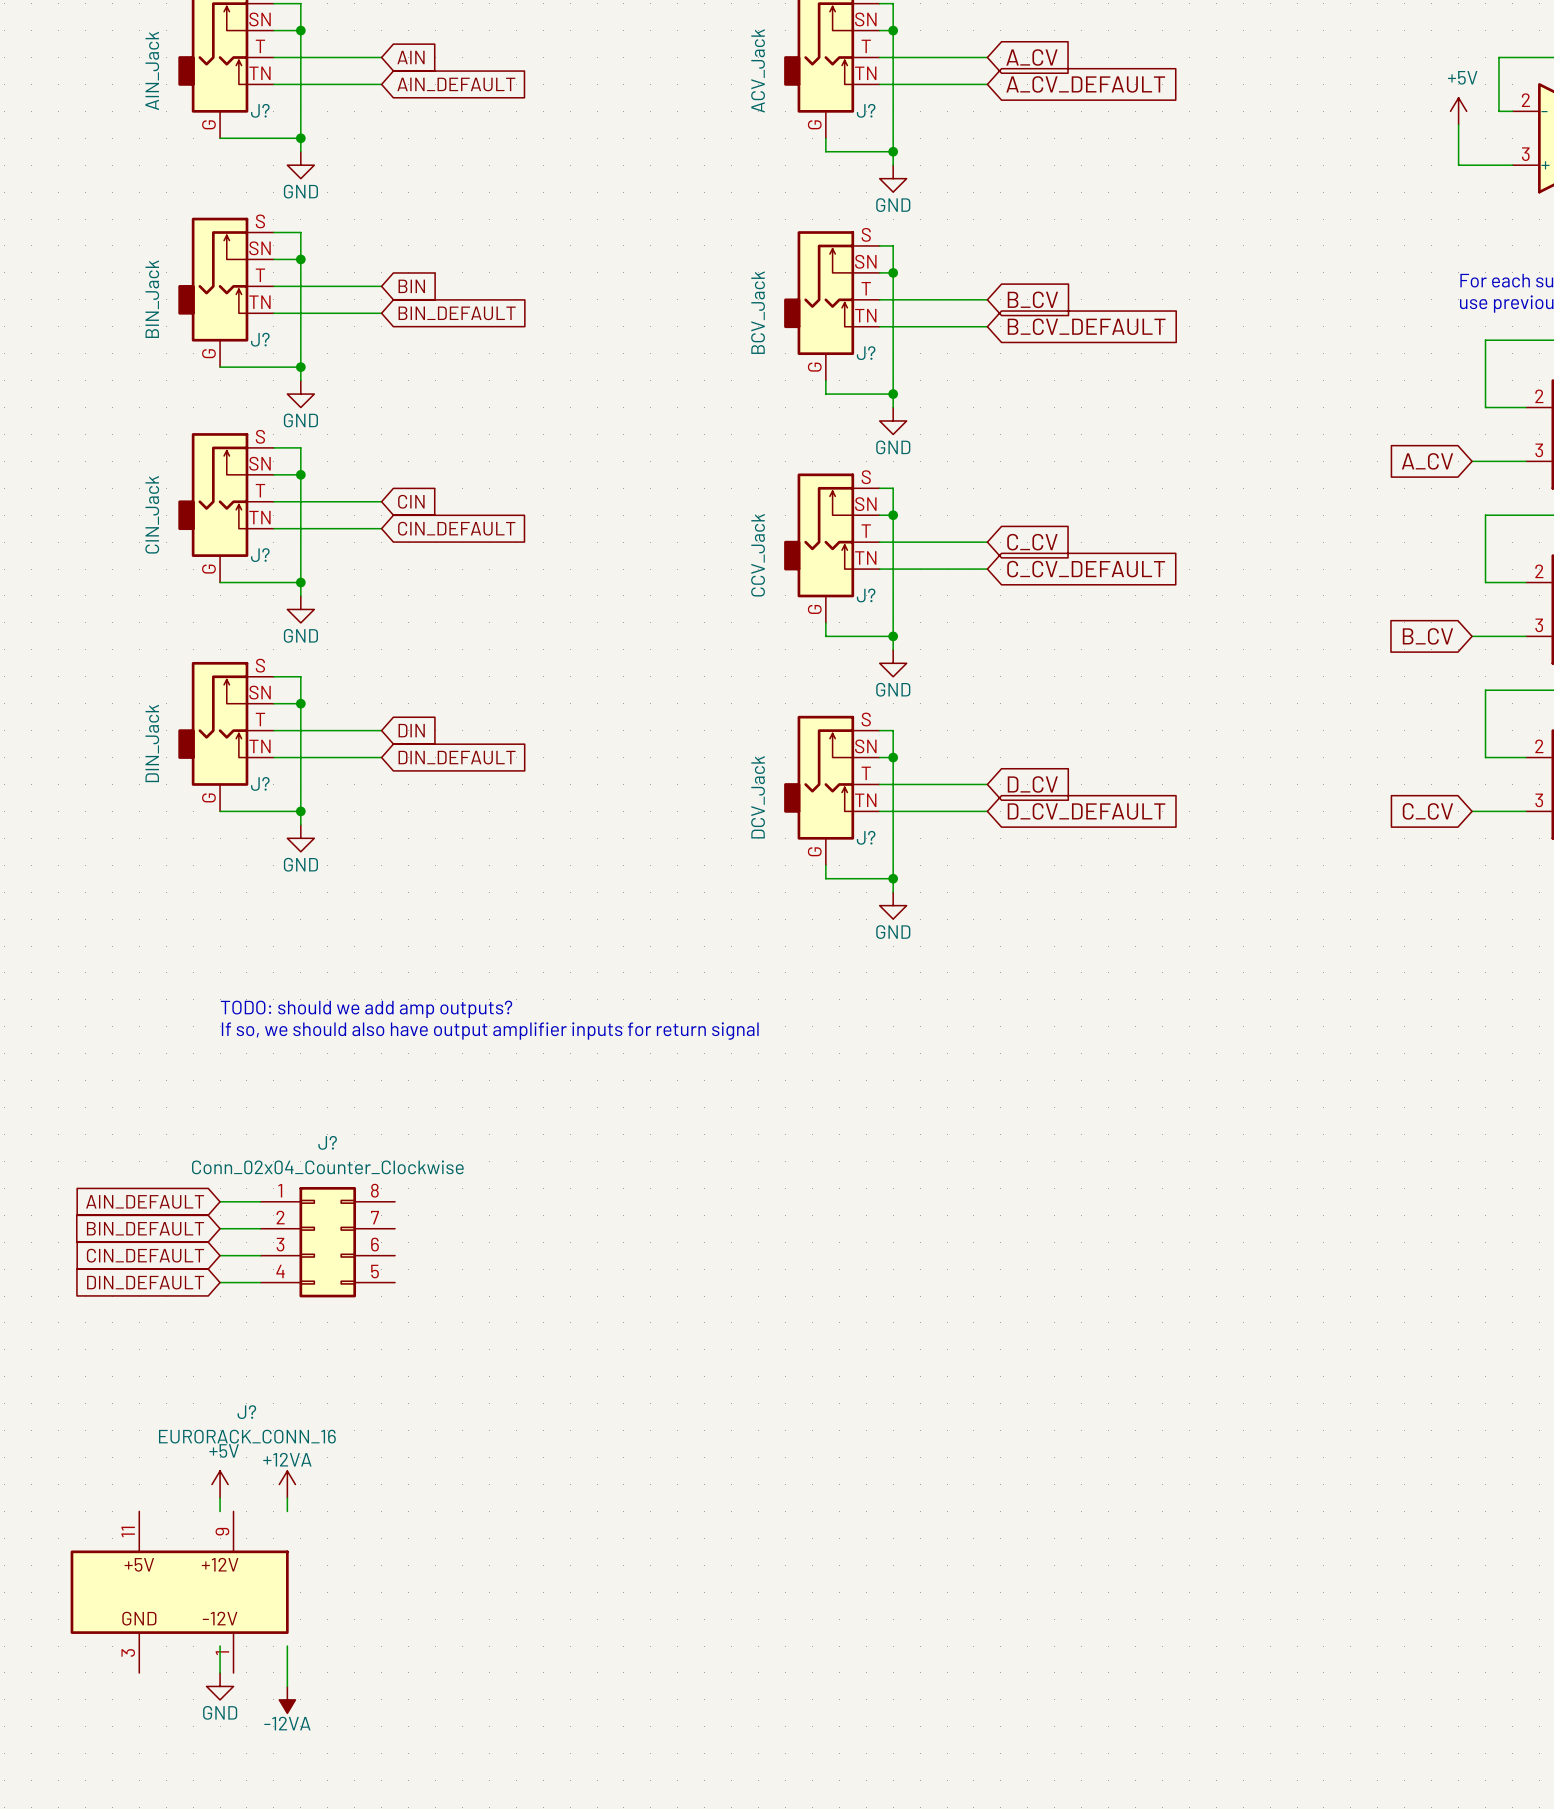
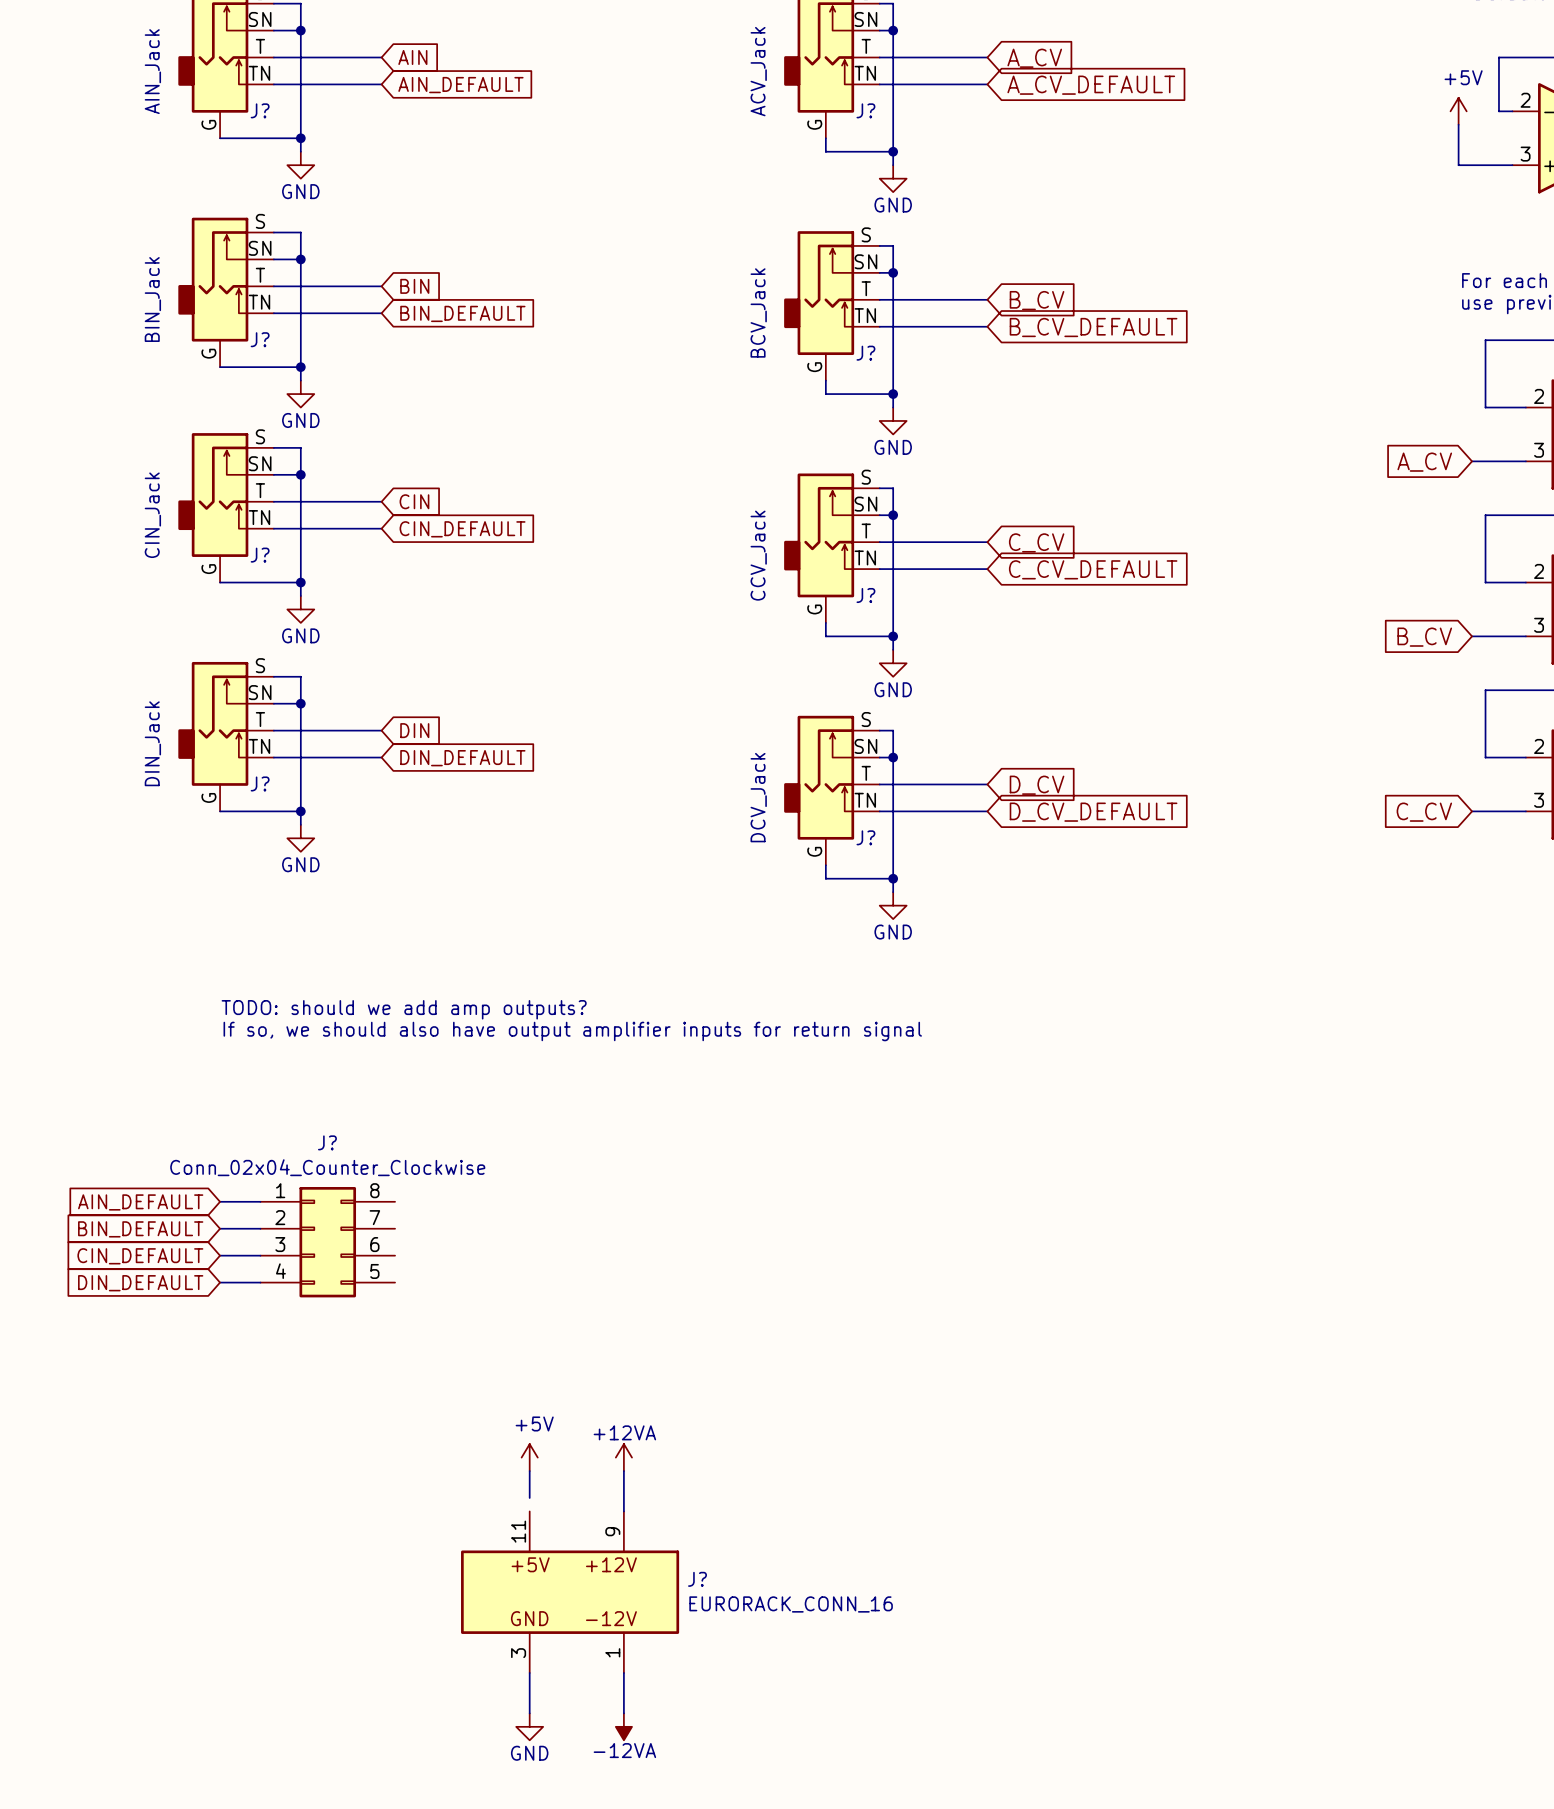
power symbol: none -> +5V (529, 1457)
power symbol: none -> +12VA (623, 1457)
wire: none -> (529, 1471) (529, 1497)
wire: none -> (623, 1471) (623, 1511)
power symbol: +5V (220, 1484) -> none
power symbol: +12VA (287, 1484) -> none
wire: (220, 1497) (220, 1511) -> none
wire: (287, 1497) (287, 1511) -> none
J?: EURORACK_CONN_16 (179, 1592) -> none
J?: none -> EURORACK_CONN_16 (570, 1592)
wire: (220, 1646) (220, 1672) -> none
wire: (287, 1646) (287, 1686) -> (529, 1672) (529, 1713)
wire: none -> (623, 1672) (623, 1713)
power symbol: GND (220, 1686) -> none
power symbol: -12VA (287, 1699) -> none
power symbol: none -> GND (529, 1726)
power symbol: none -> -12VA (623, 1726)

